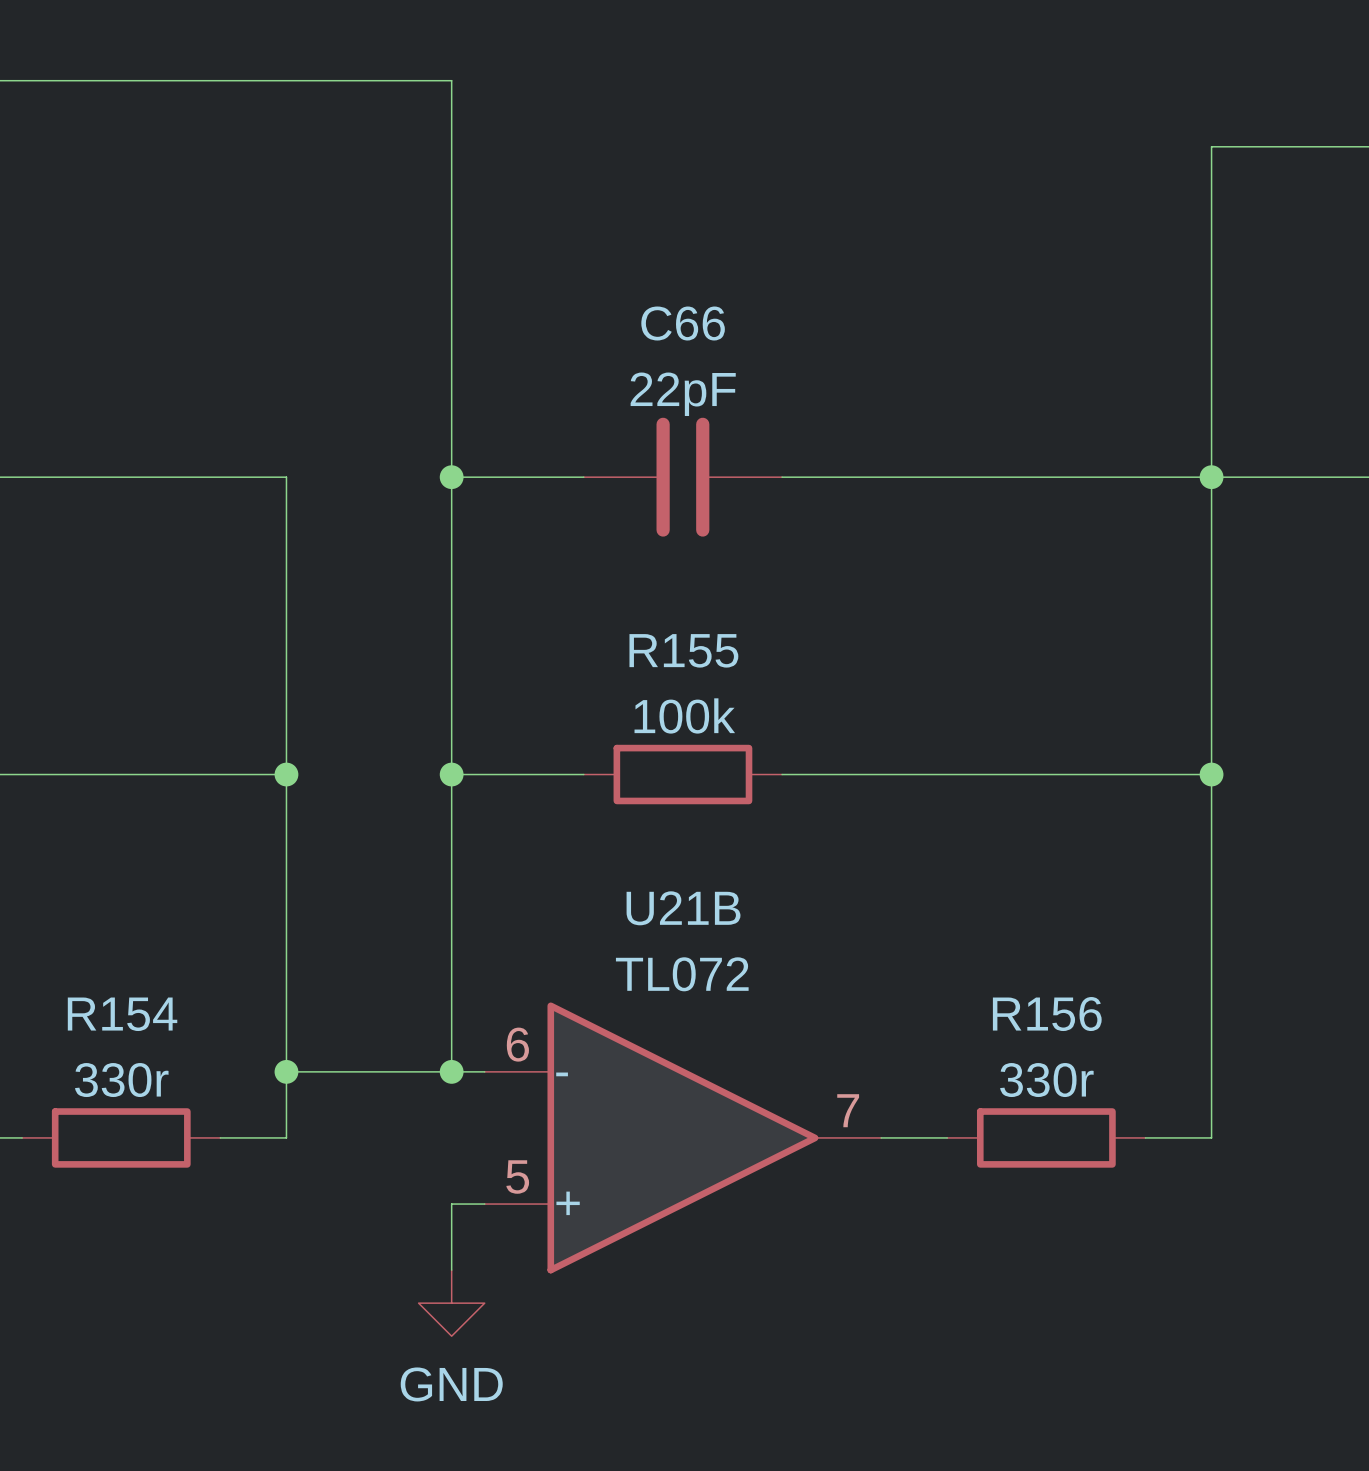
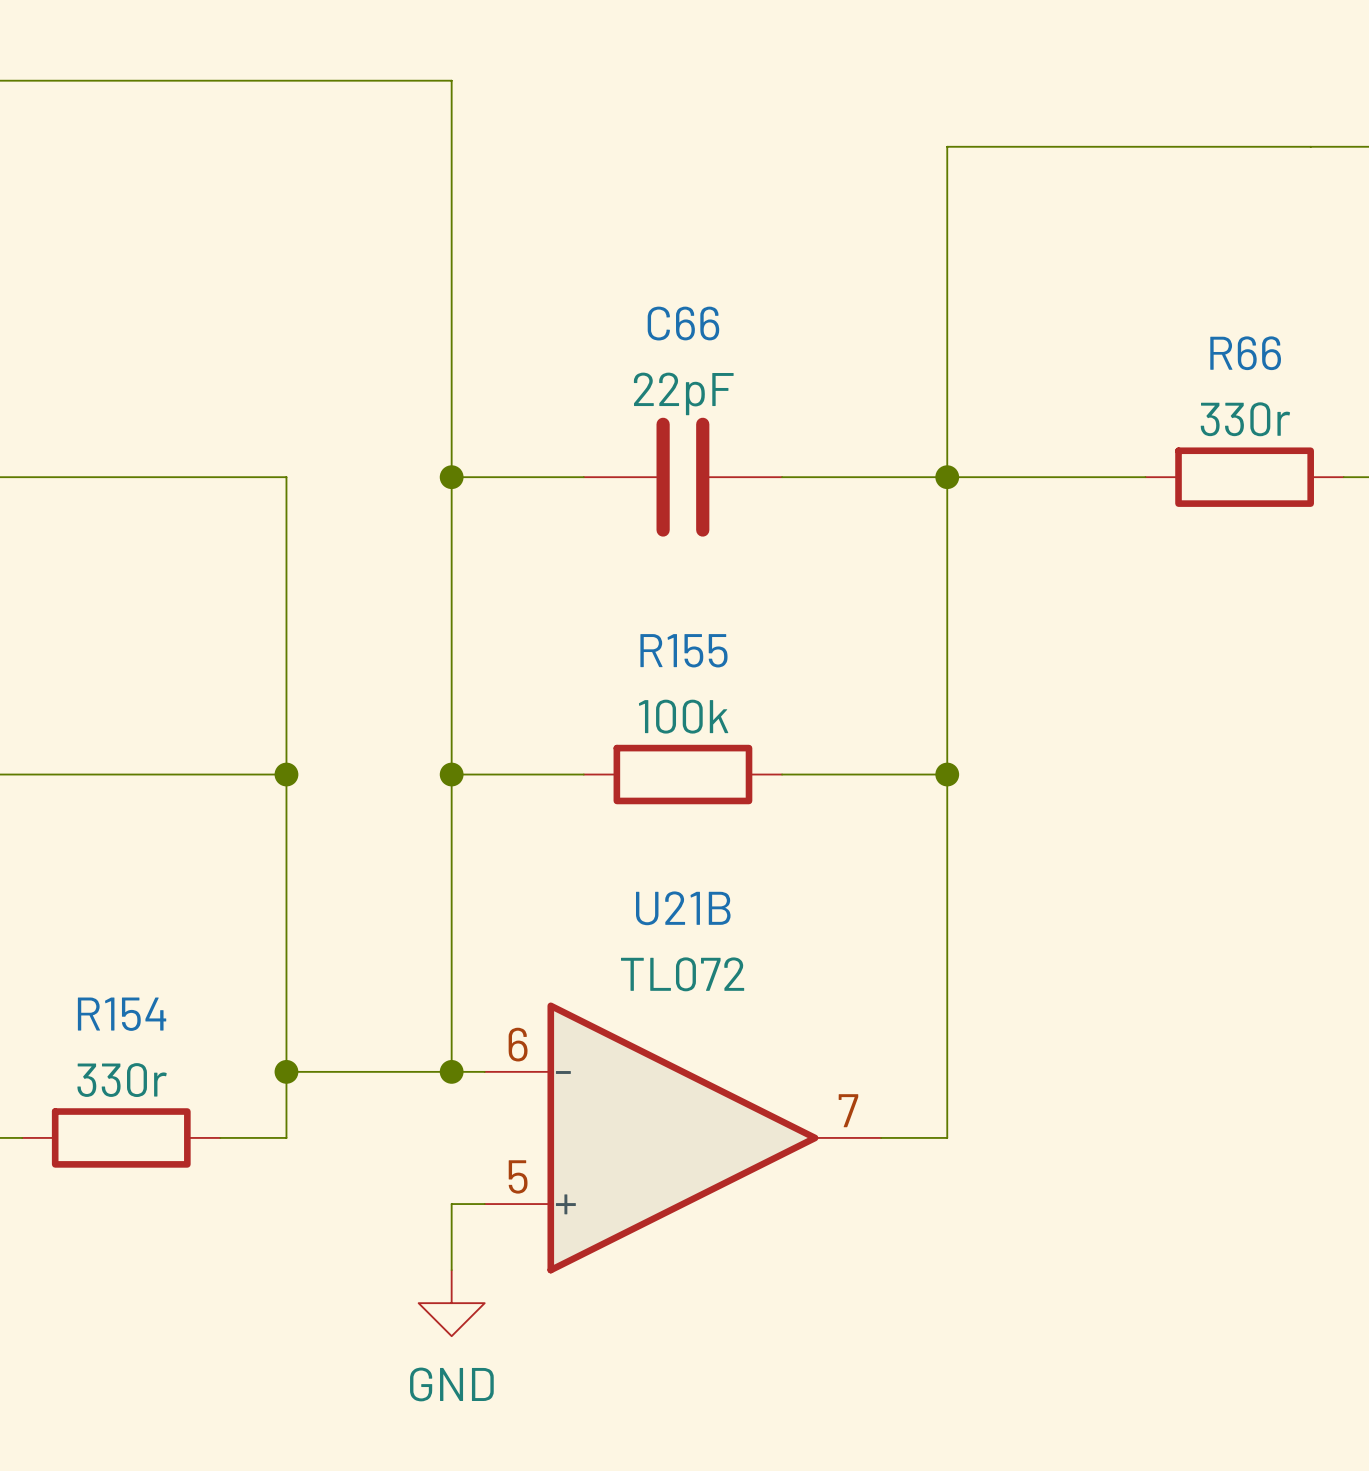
wire: (1211, 146) (1211, 1137) (1145, 1137) -> (1211, 146) (947, 146) (947, 1137)
junction: none -> (947, 477)
wire: (1145, 477) (1343, 477) -> none
junction: (1211, 477) -> none
R66: none -> 330r (1244, 477)
wire: (947, 774) (1211, 774) -> none
junction: none -> (947, 774)
junction: (1211, 774) -> none
R156: 330r (1046, 1137) -> none

